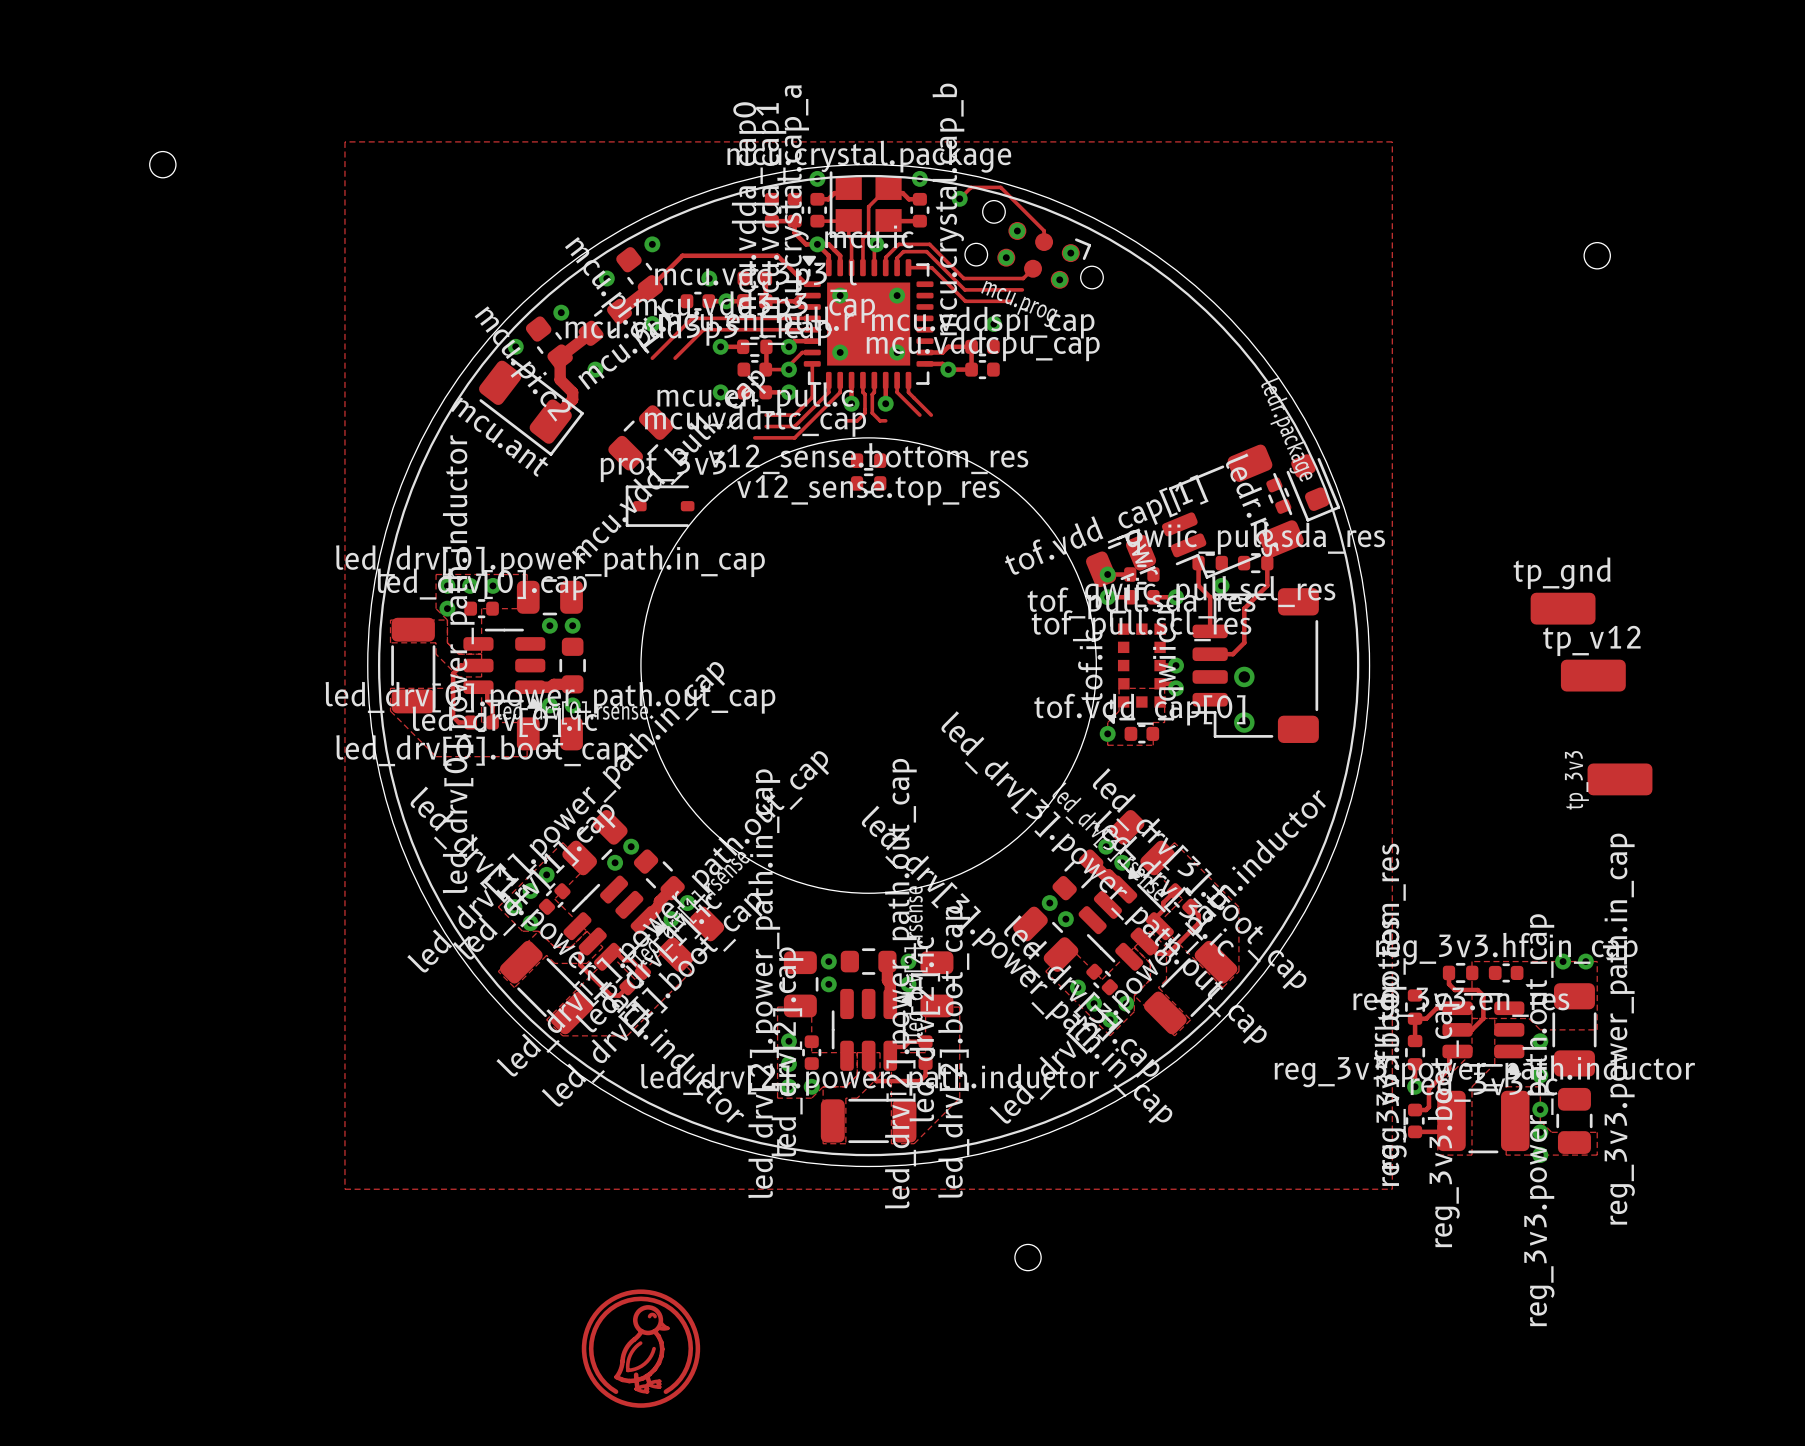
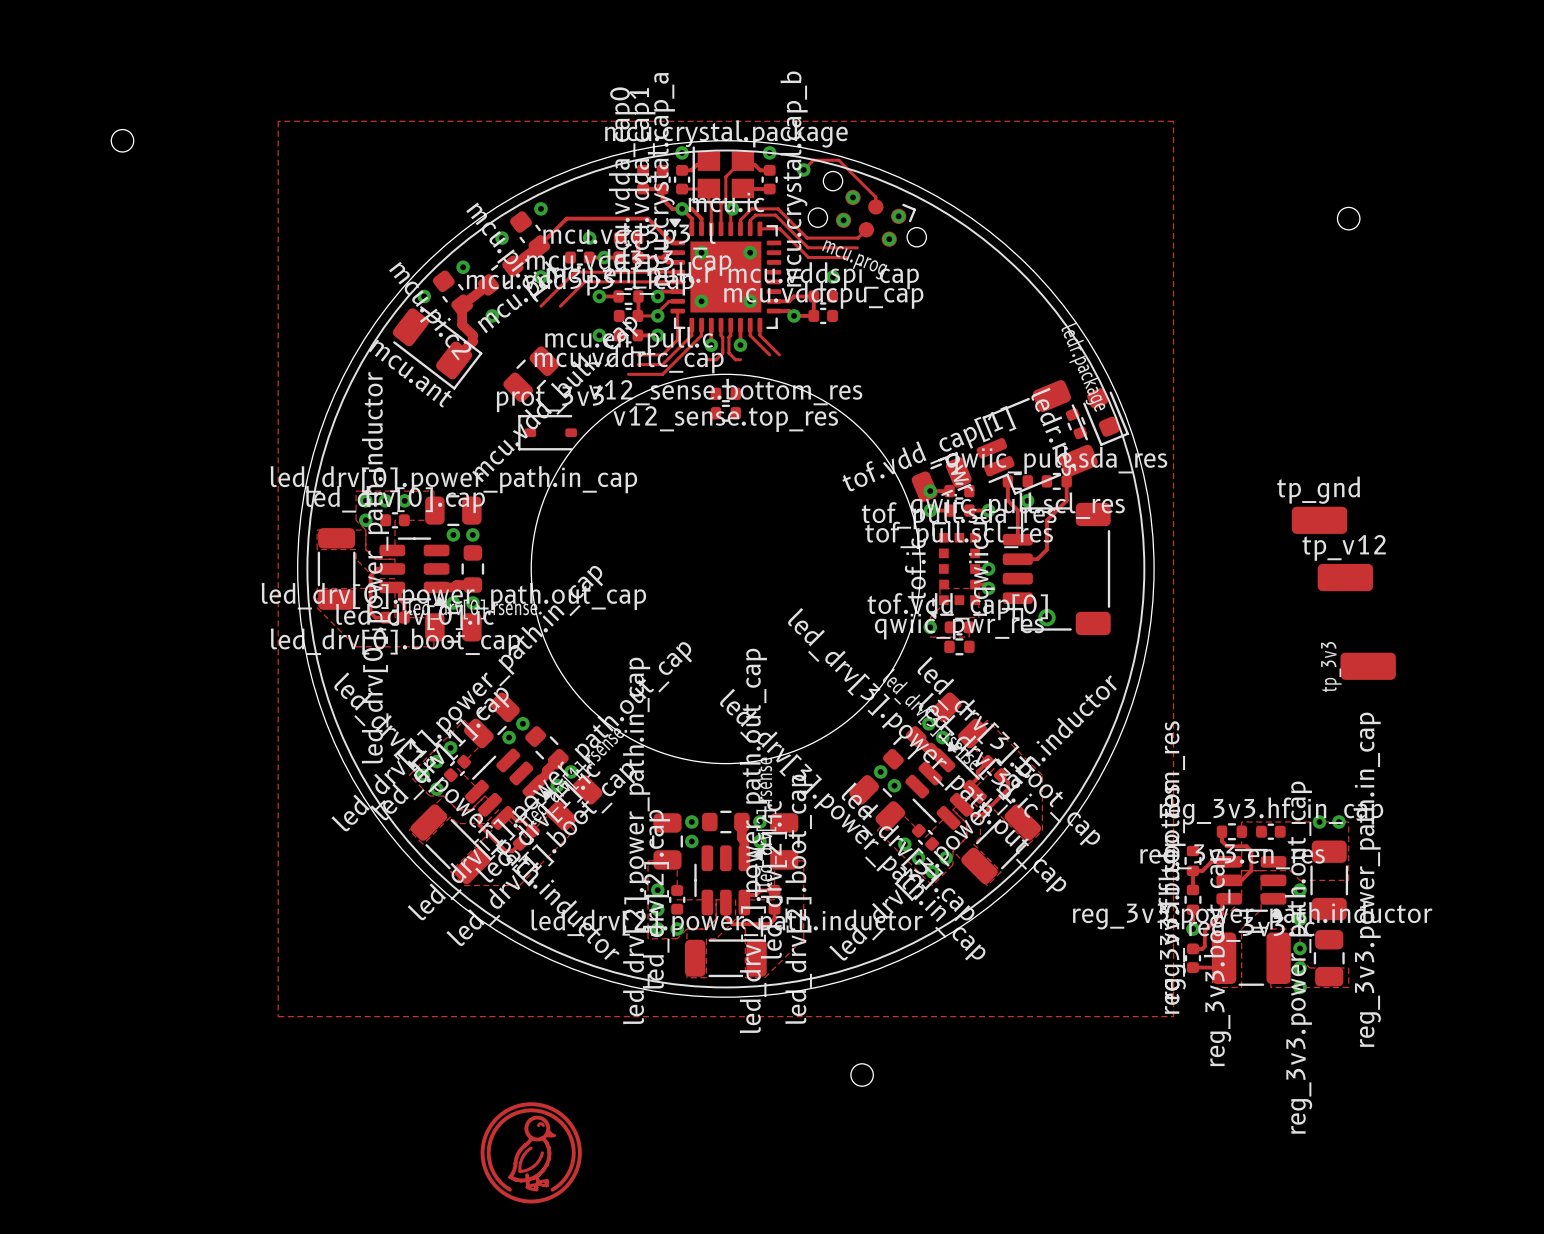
via: (1244, 676) -> none
qwiic_pwr_res: none -> (959, 646)

